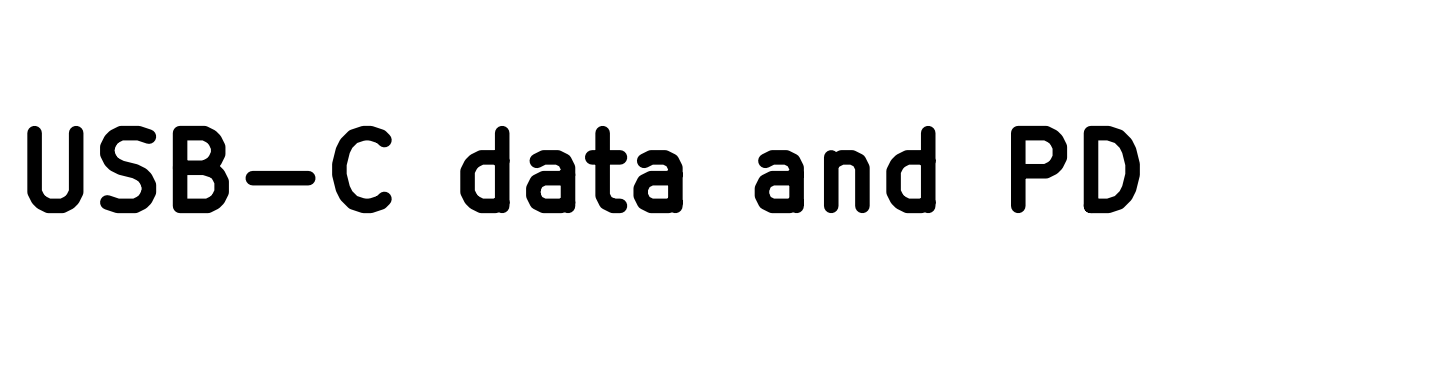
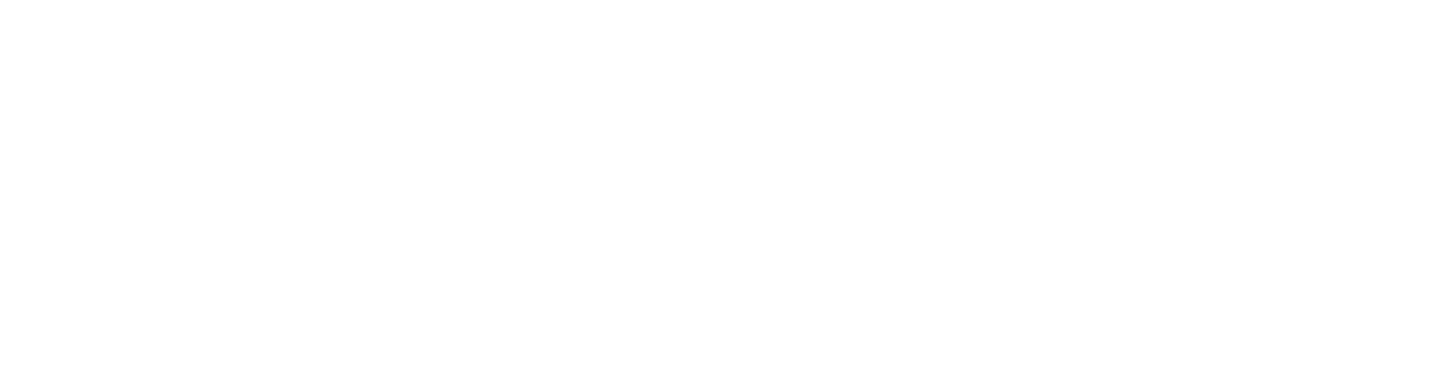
text: USB-C data and PD (583, 169) -> none

